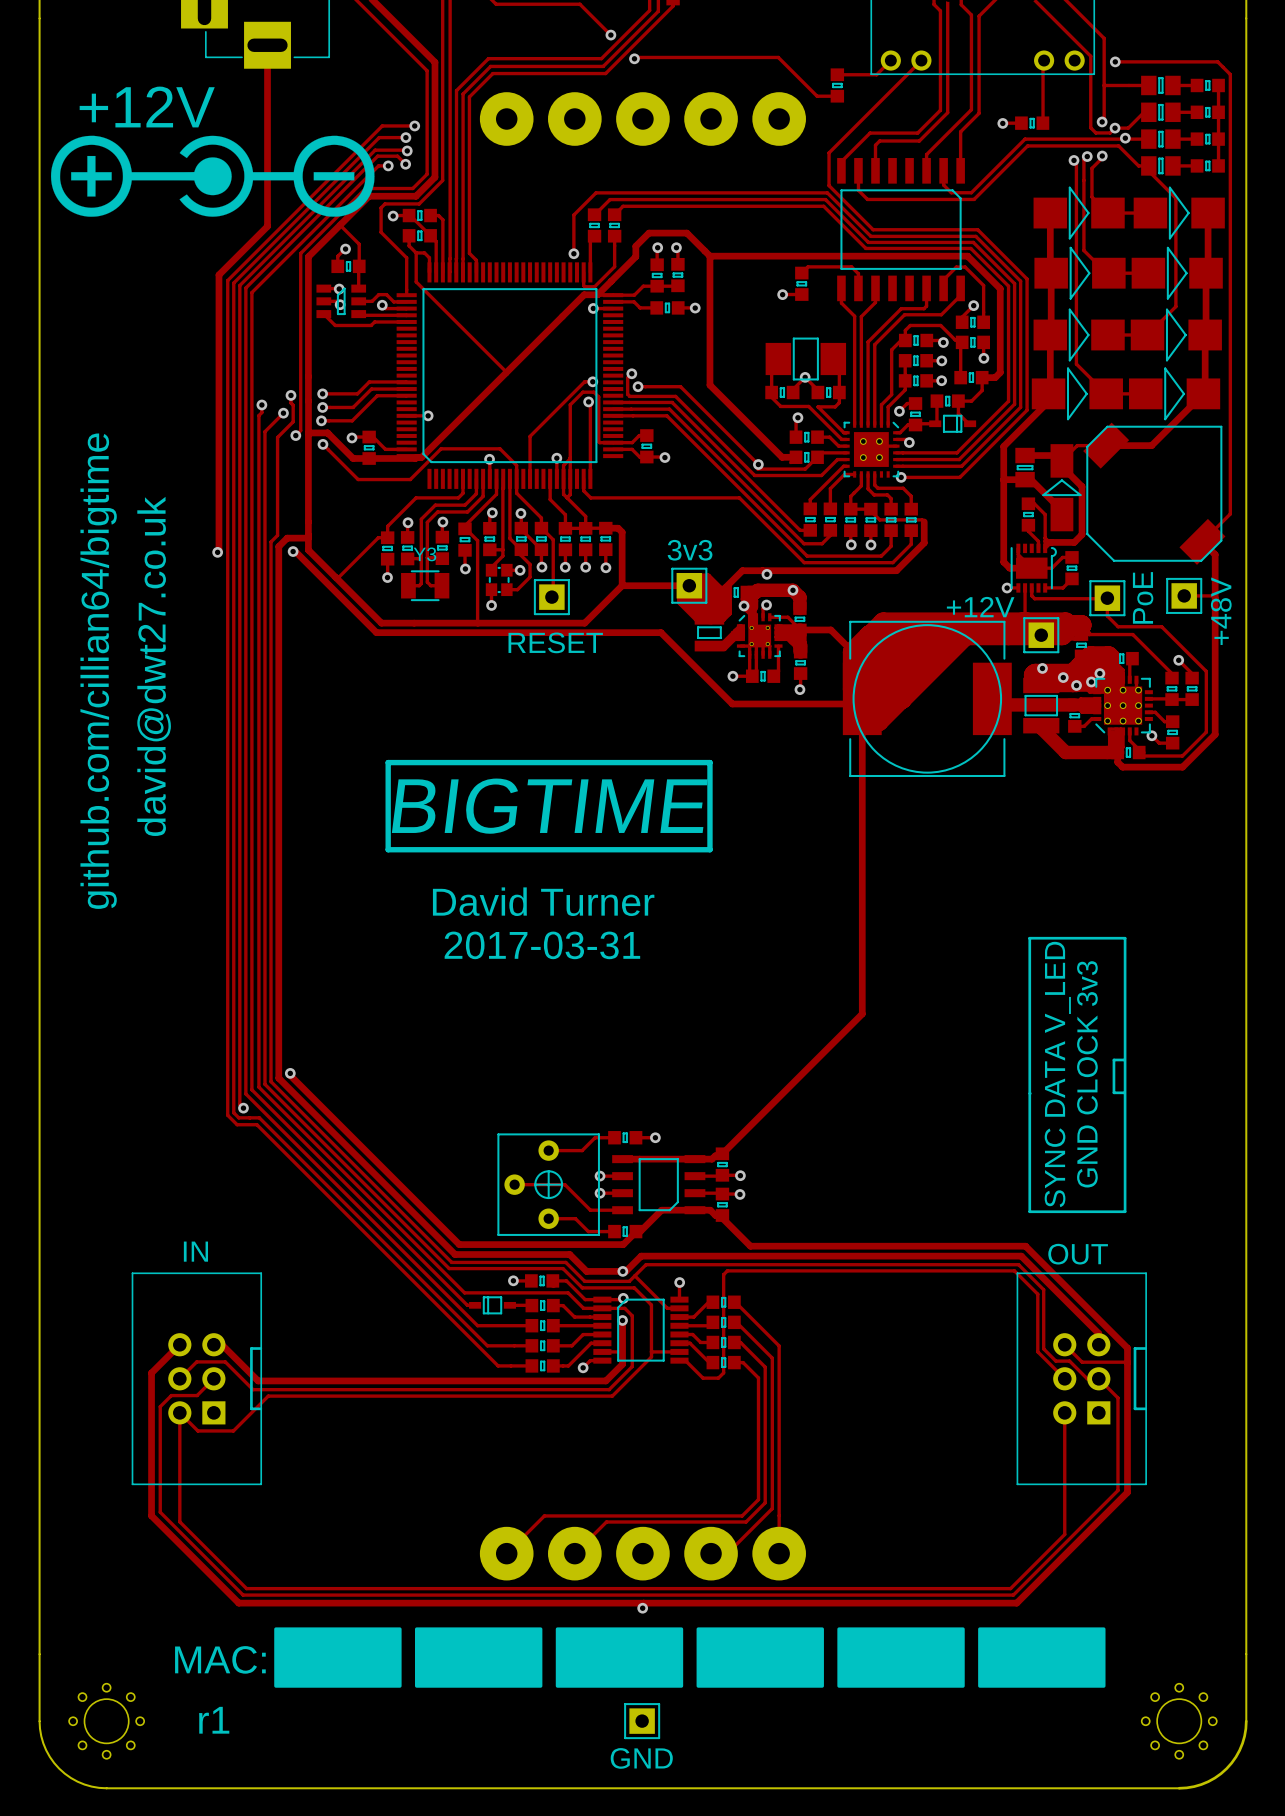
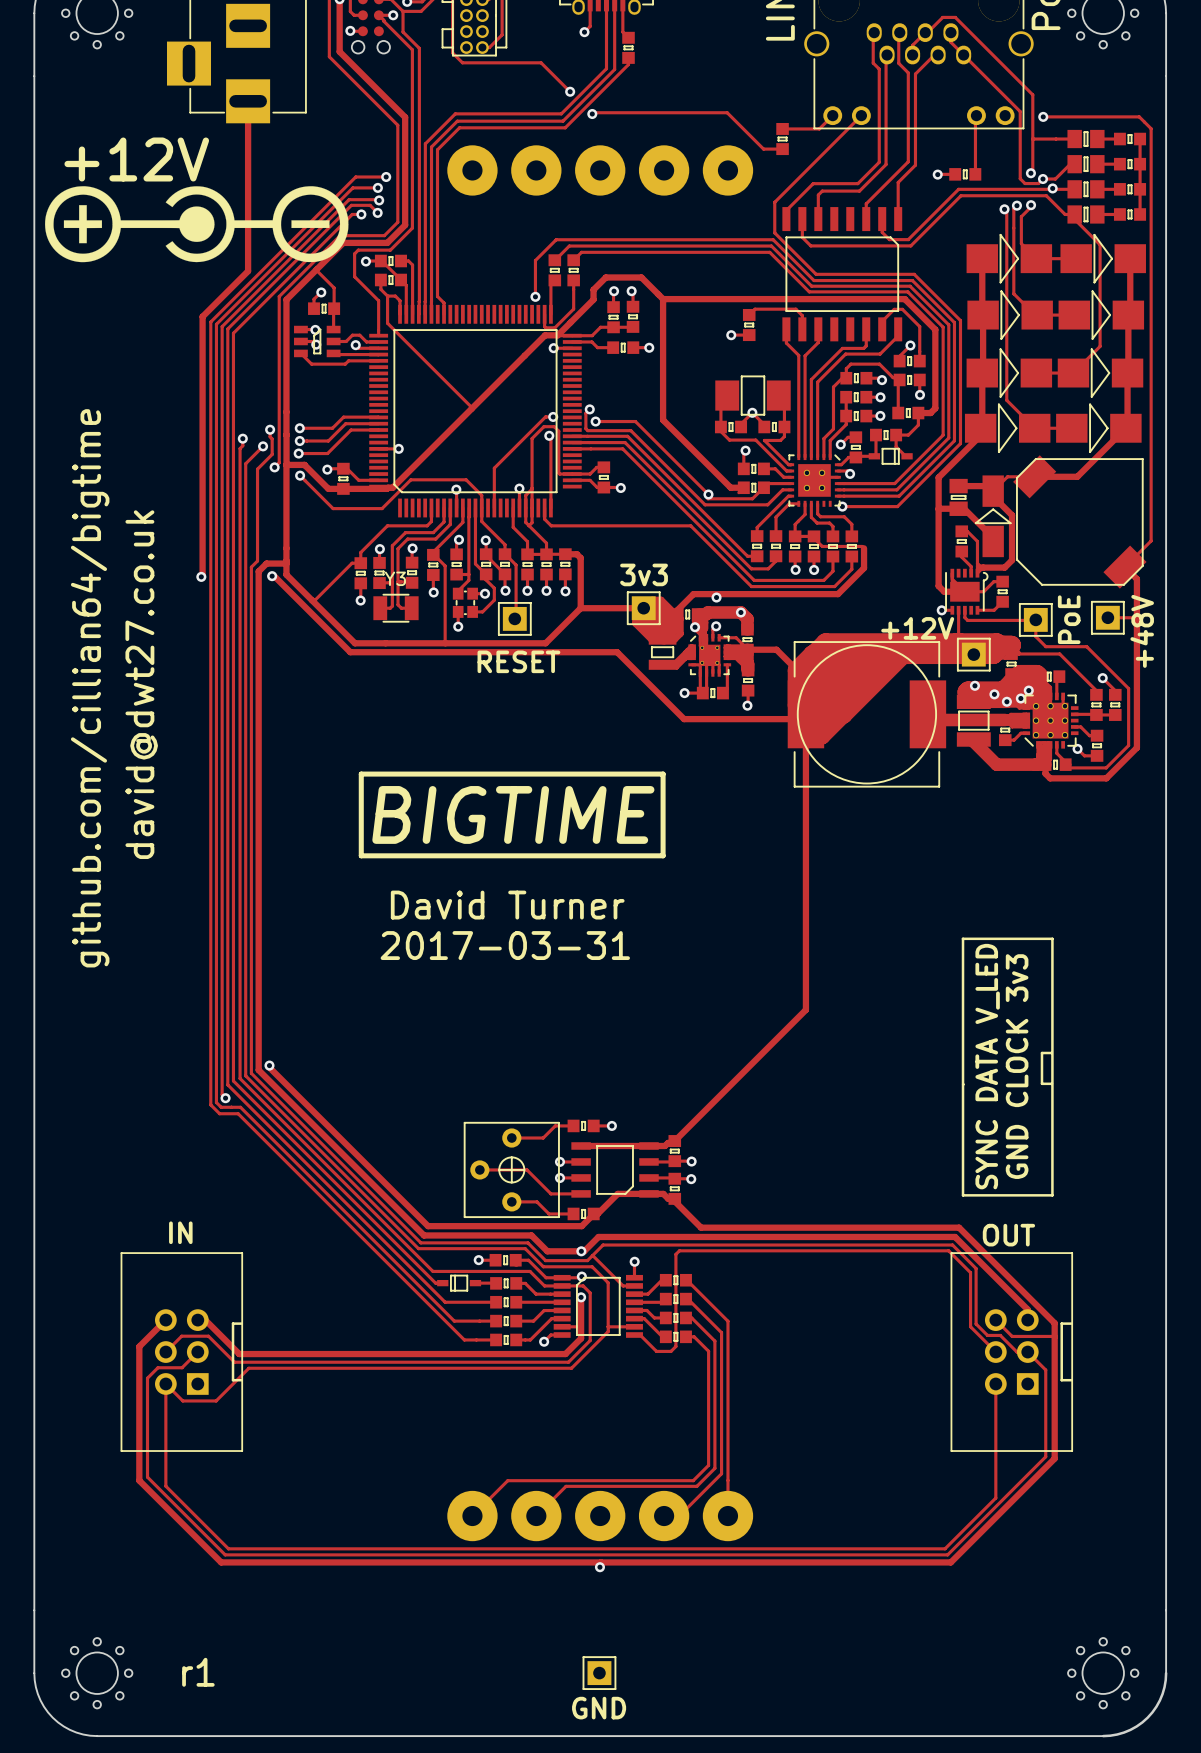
drawing: [274, 1627, 1106, 1688] -> none
text: MAC: (220, 1659) -> none

